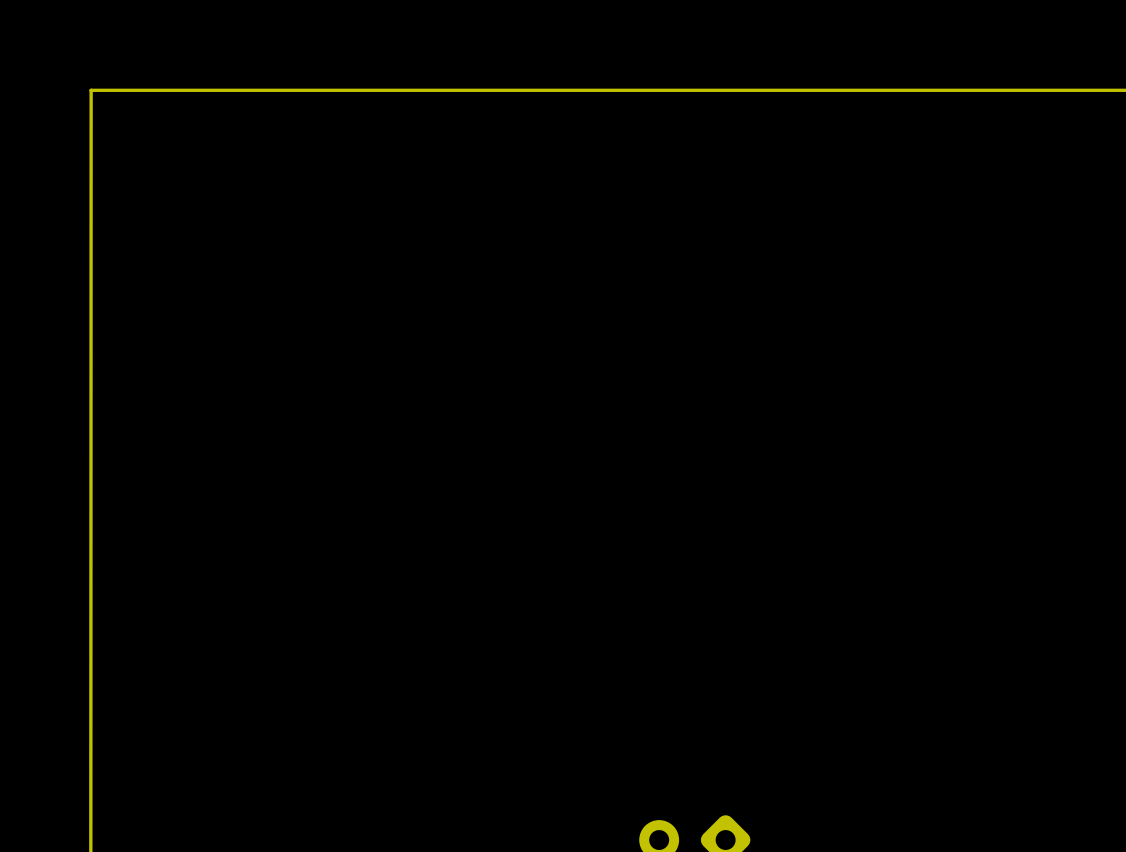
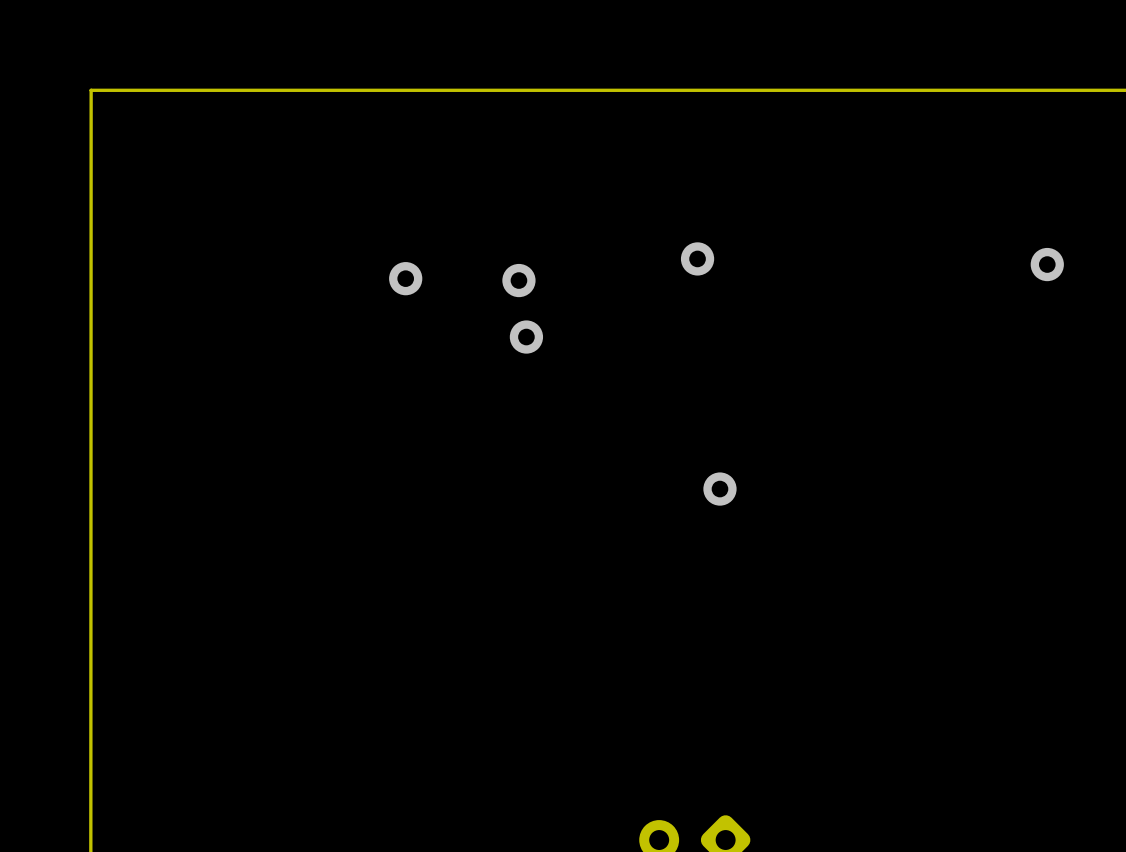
via: none -> (697, 258)
via: none -> (1047, 264)
via: none -> (405, 278)
via: none -> (518, 280)
via: none -> (526, 337)
via: none -> (719, 489)

